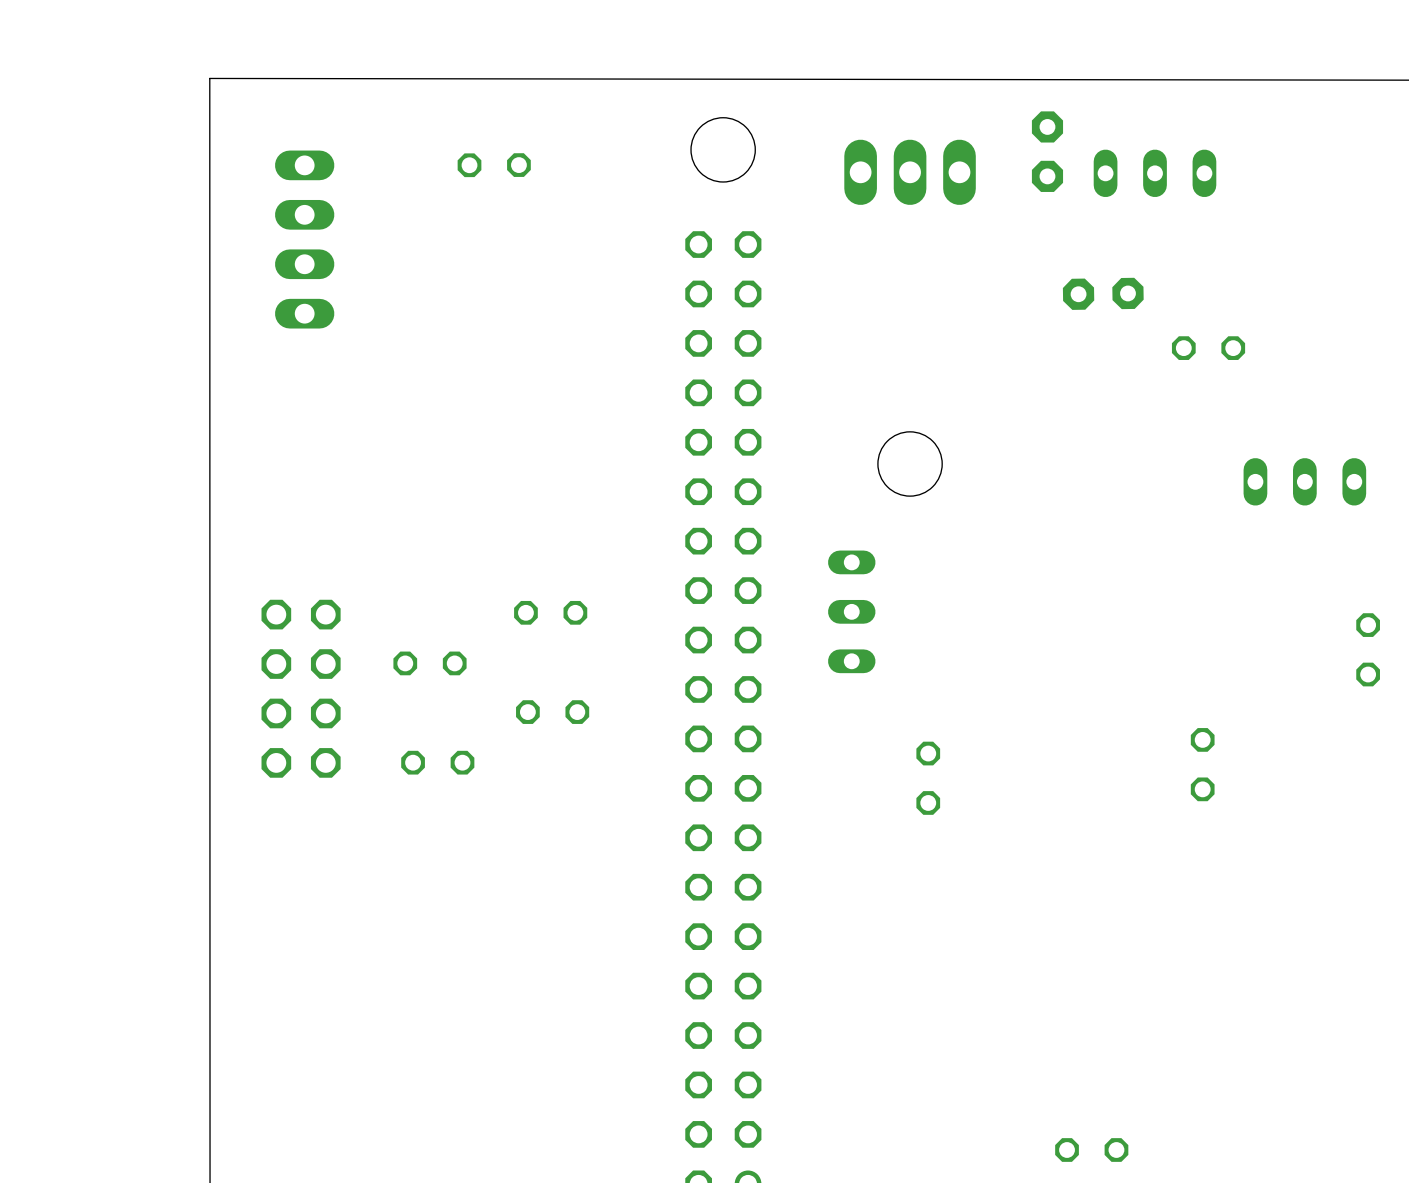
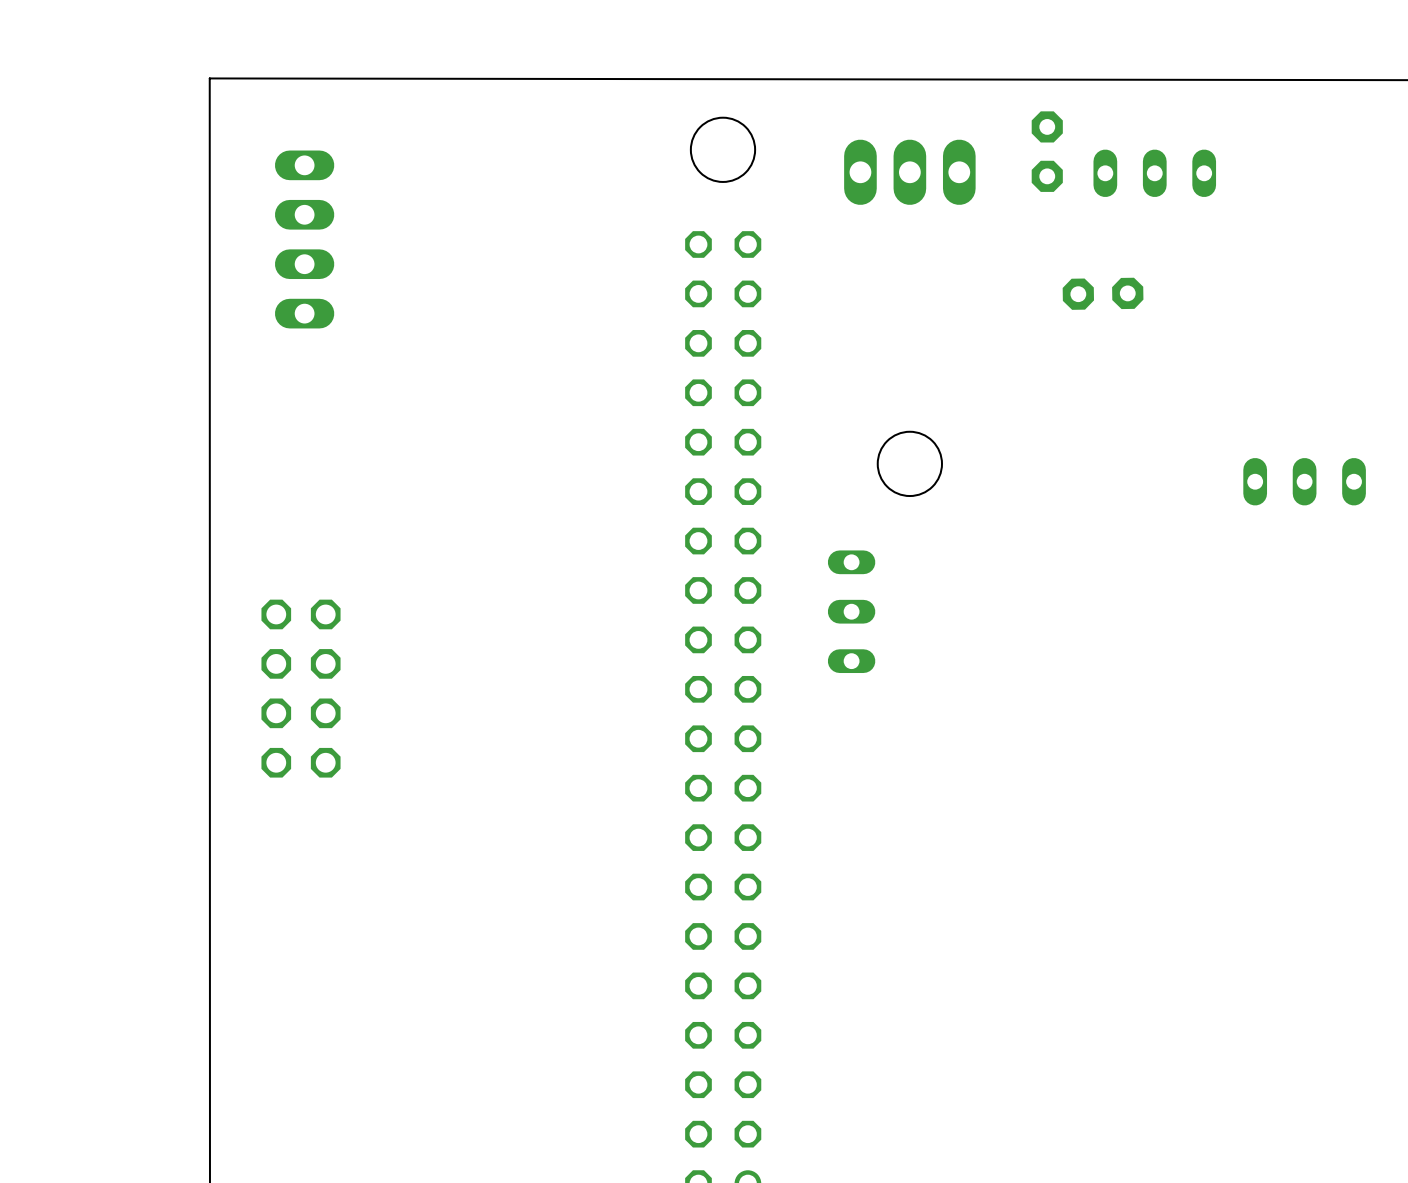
part: (494, 165) -> none
part: (1208, 348) -> none
part: (550, 612) -> none
part: (1368, 649) -> none
part: (429, 663) -> none
part: (552, 712) -> none
part: (437, 762) -> none
part: (1202, 764) -> none
part: (928, 778) -> none
part: (1091, 1150) -> none

